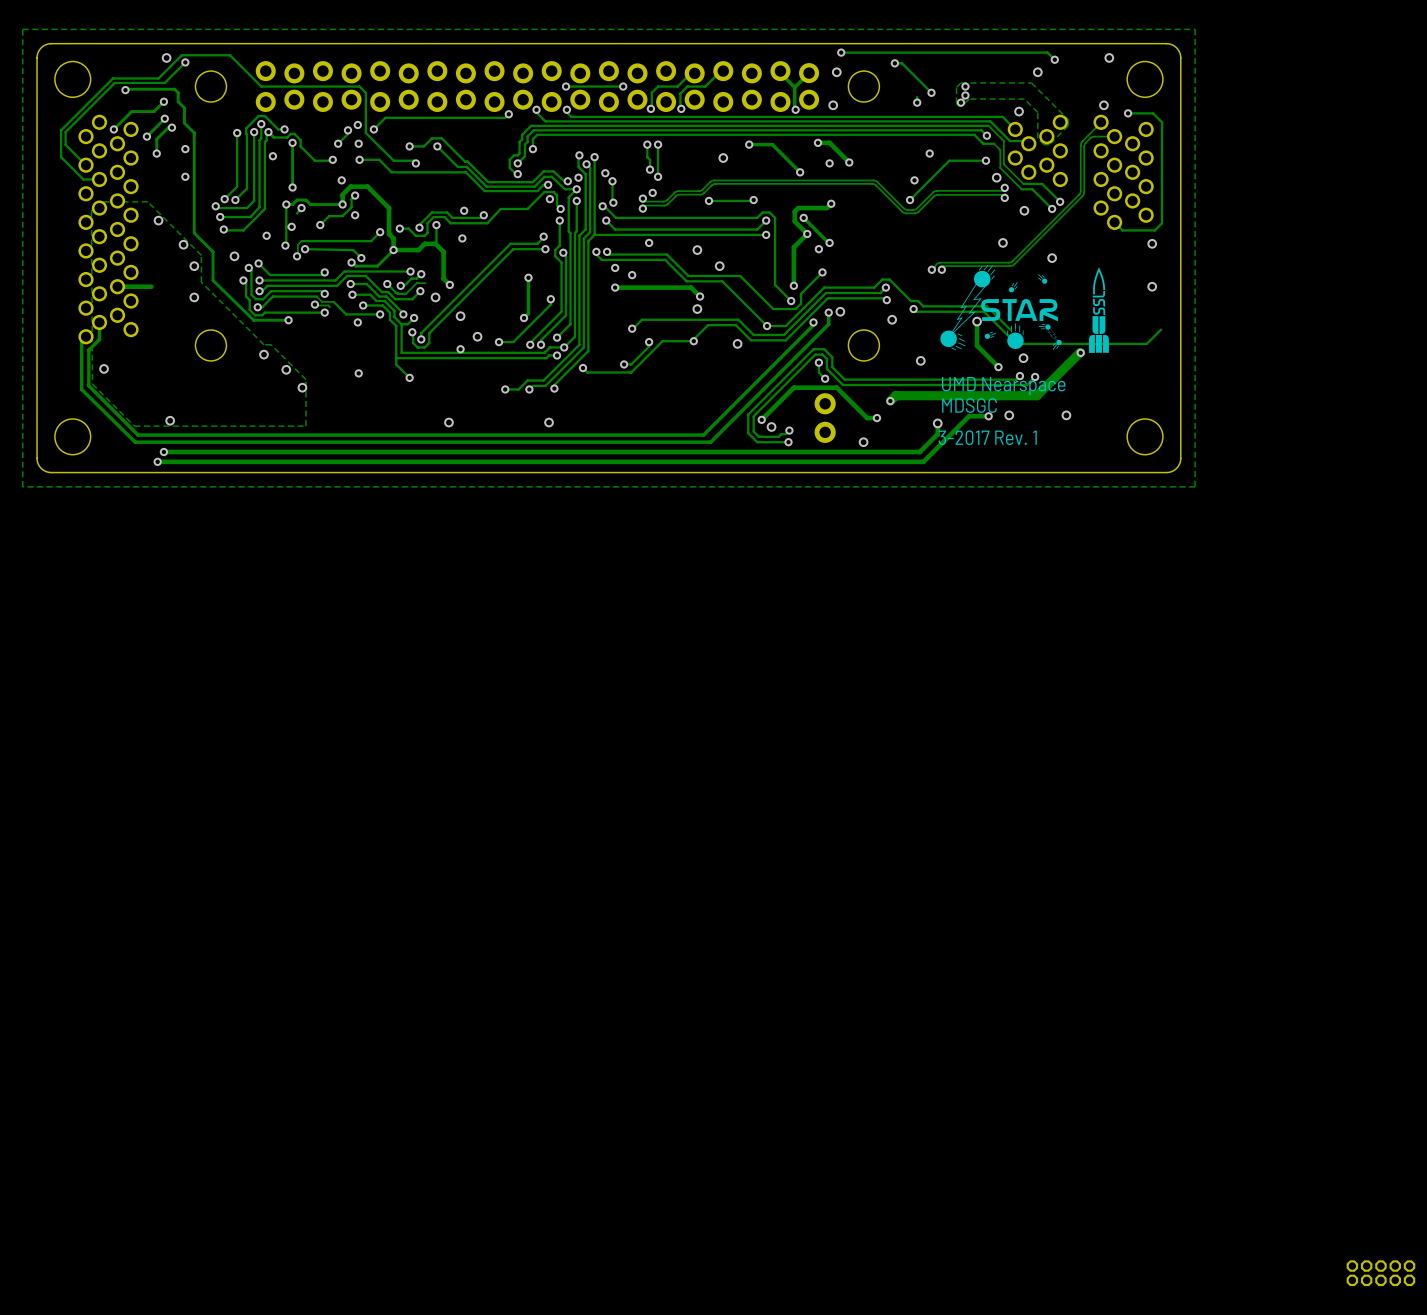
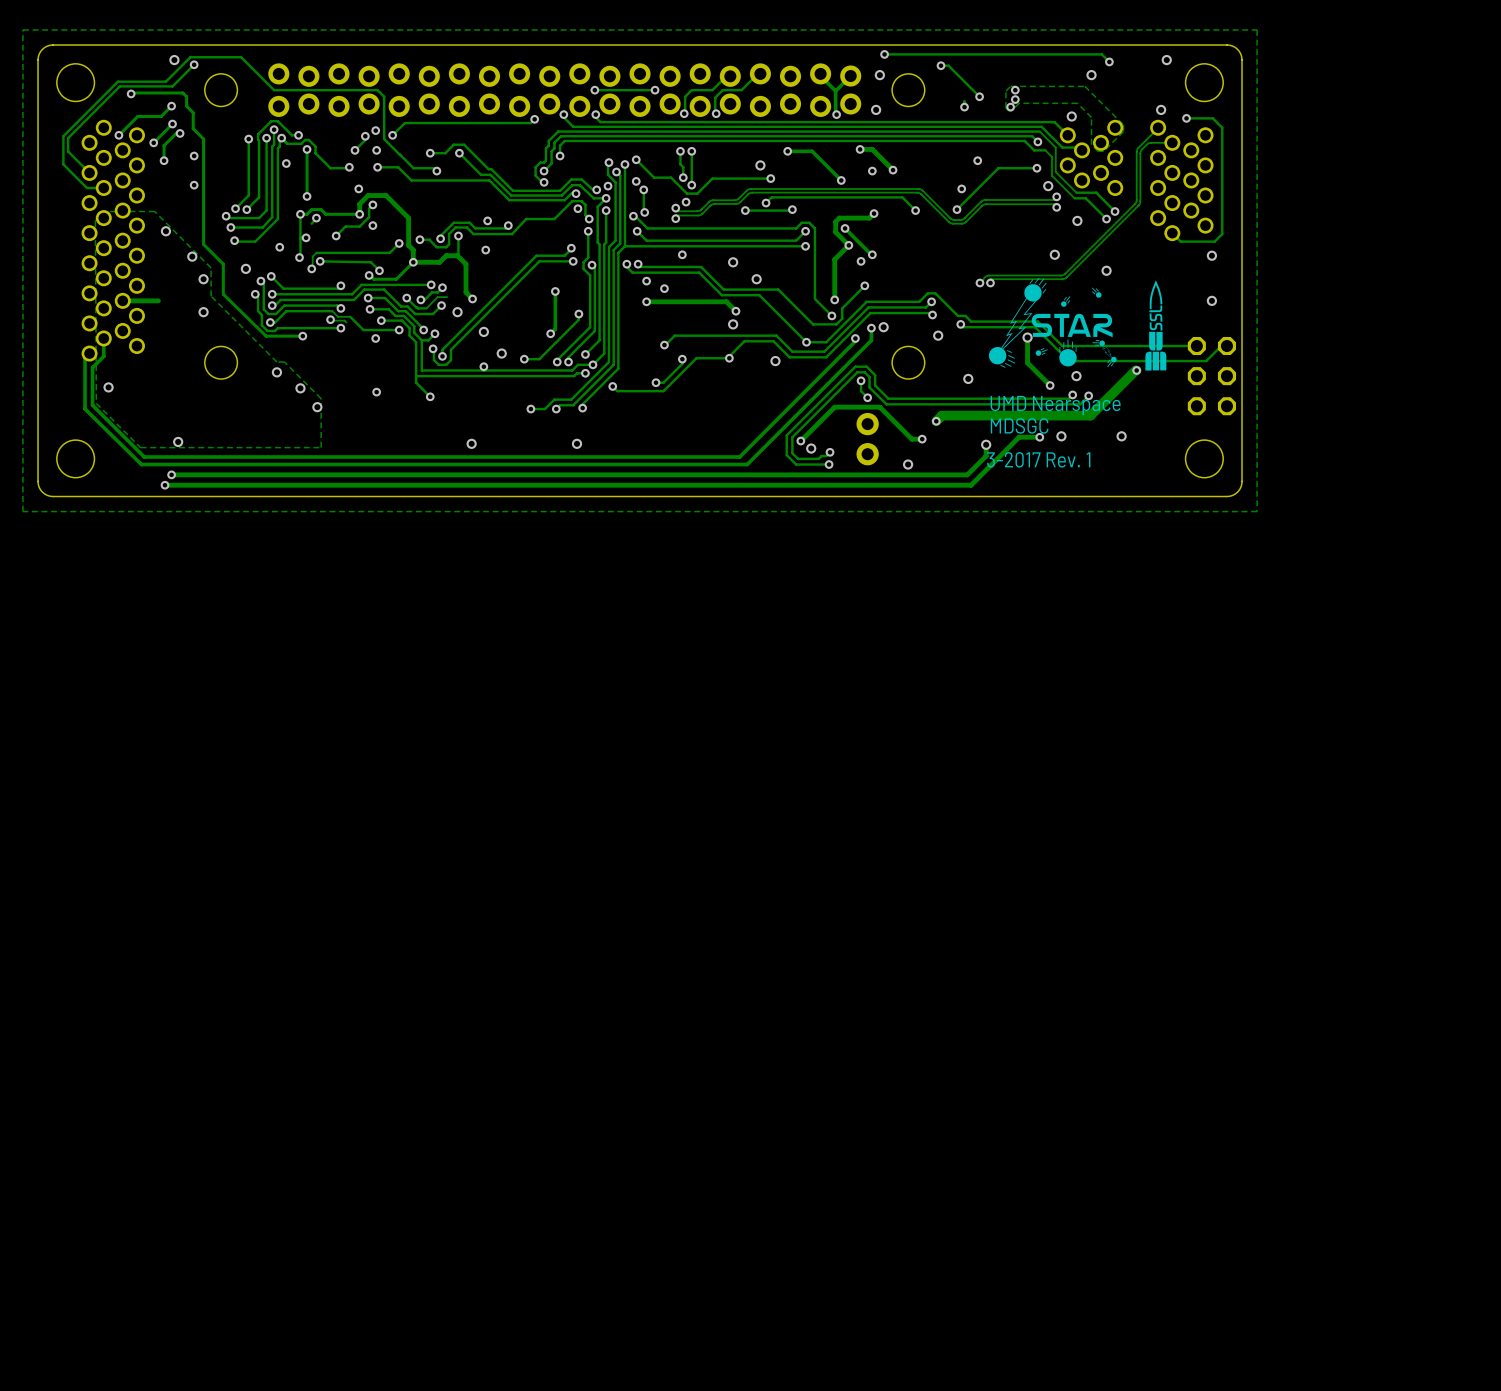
track: none -> (636, 159) (654, 177) (671, 177) (687, 193) (697, 193) (712, 178) (770, 178)
via: none -> (636, 159)
via: none -> (770, 178)
track: none -> (766, 203) (771, 197) (902, 197) (915, 210)
via: none -> (766, 203)
via: none -> (915, 210)
track: none -> (1196, 346) (1062, 346)
part: none -> (1211, 376)
part: (1380, 1273) -> none

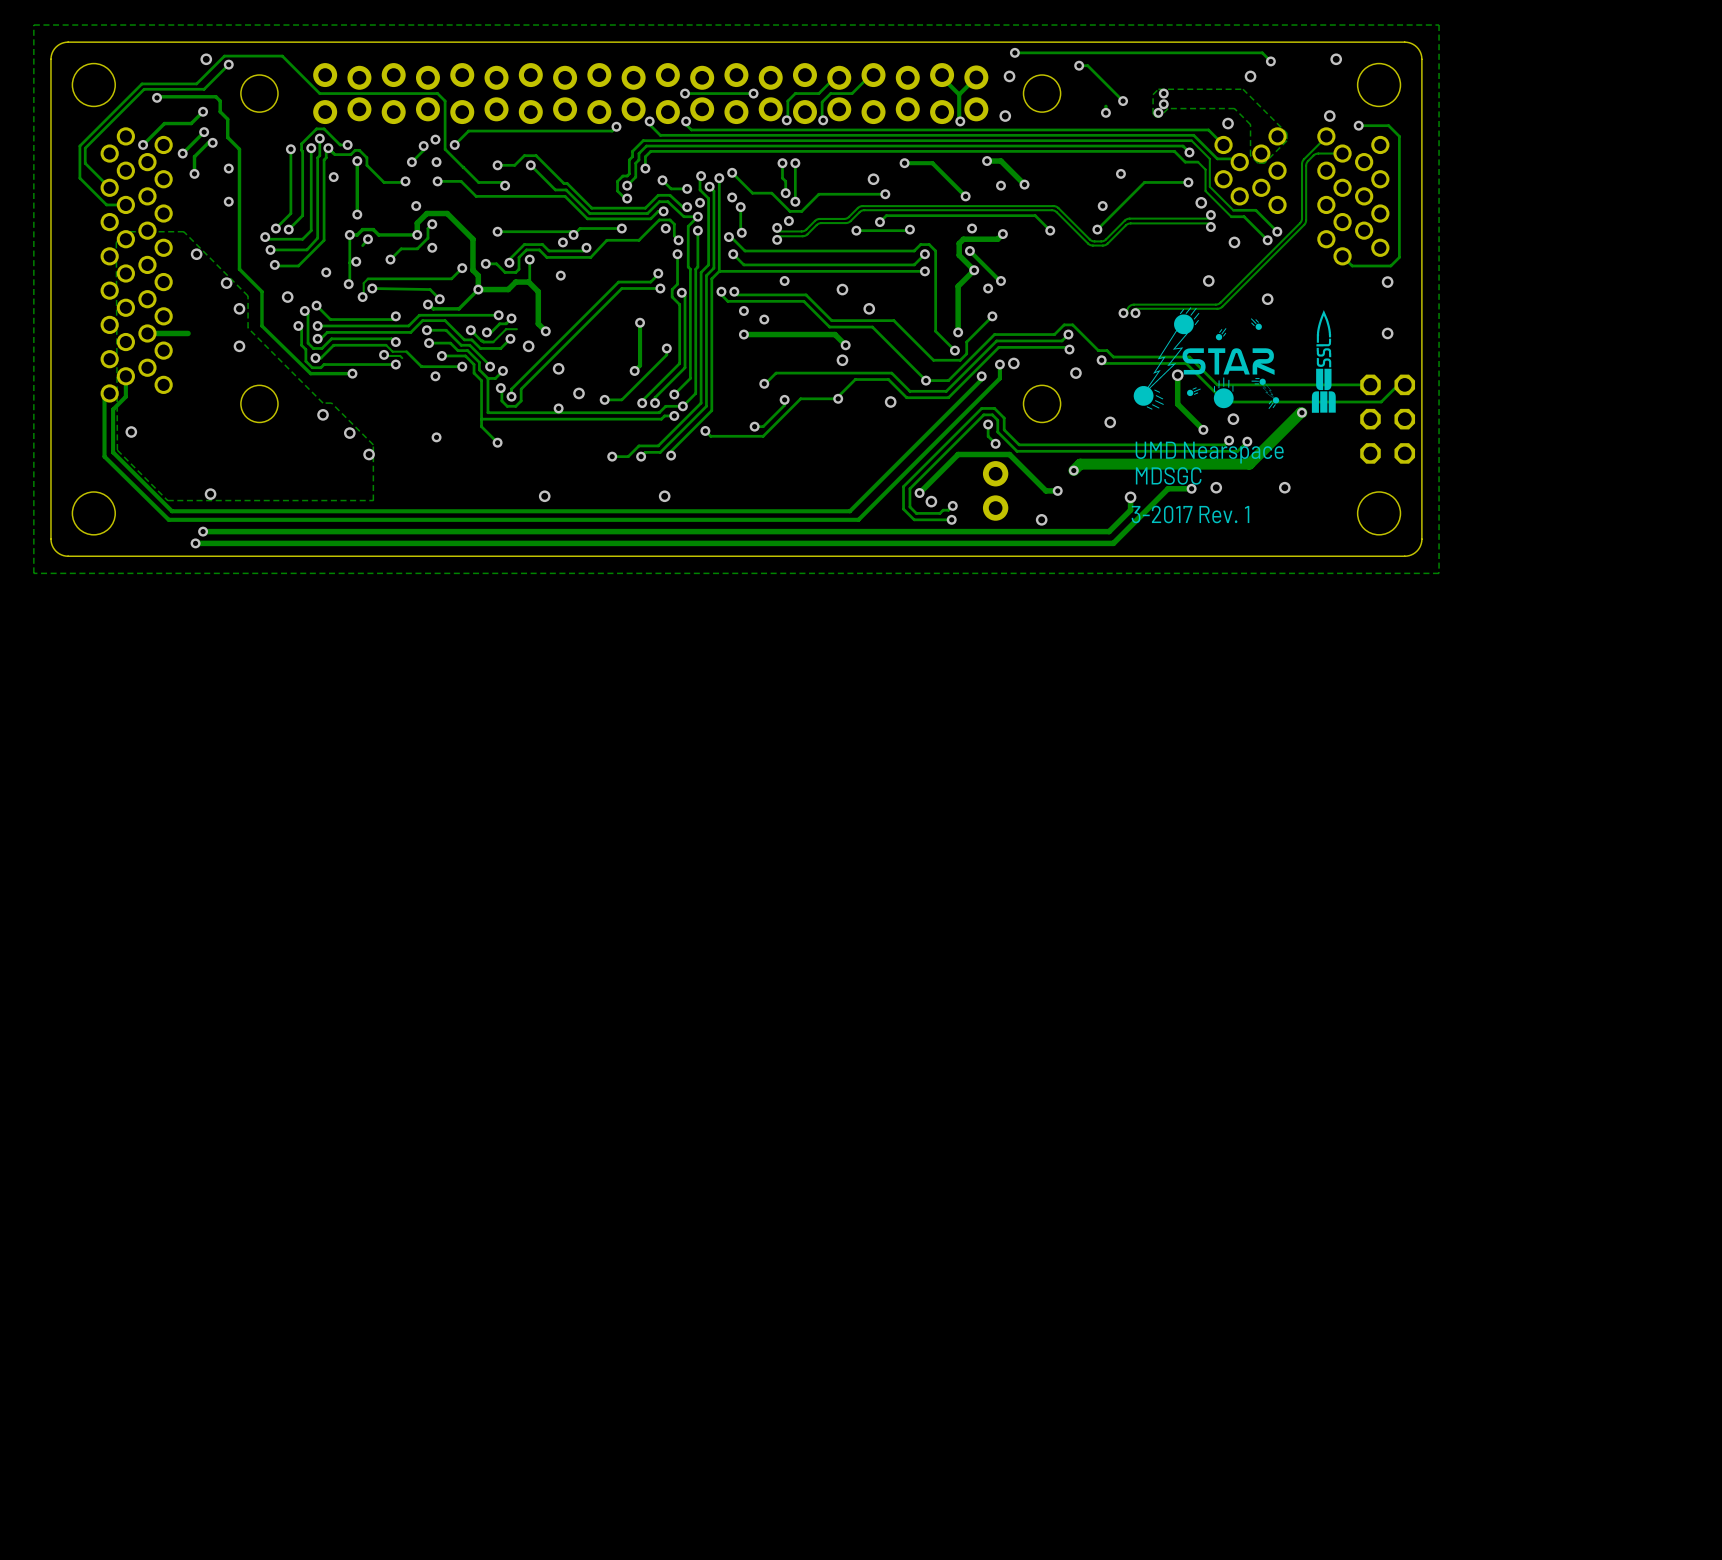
track: none -> (662, 180) (671, 188) (687, 188)
via: none -> (662, 180)
via: none -> (687, 188)
track: none -> (621, 228) (580, 228) (573, 234) (570, 231) (497, 231)
via: none -> (621, 228)
via: none -> (972, 228)
via: none -> (497, 231)
via: none -> (573, 234)

